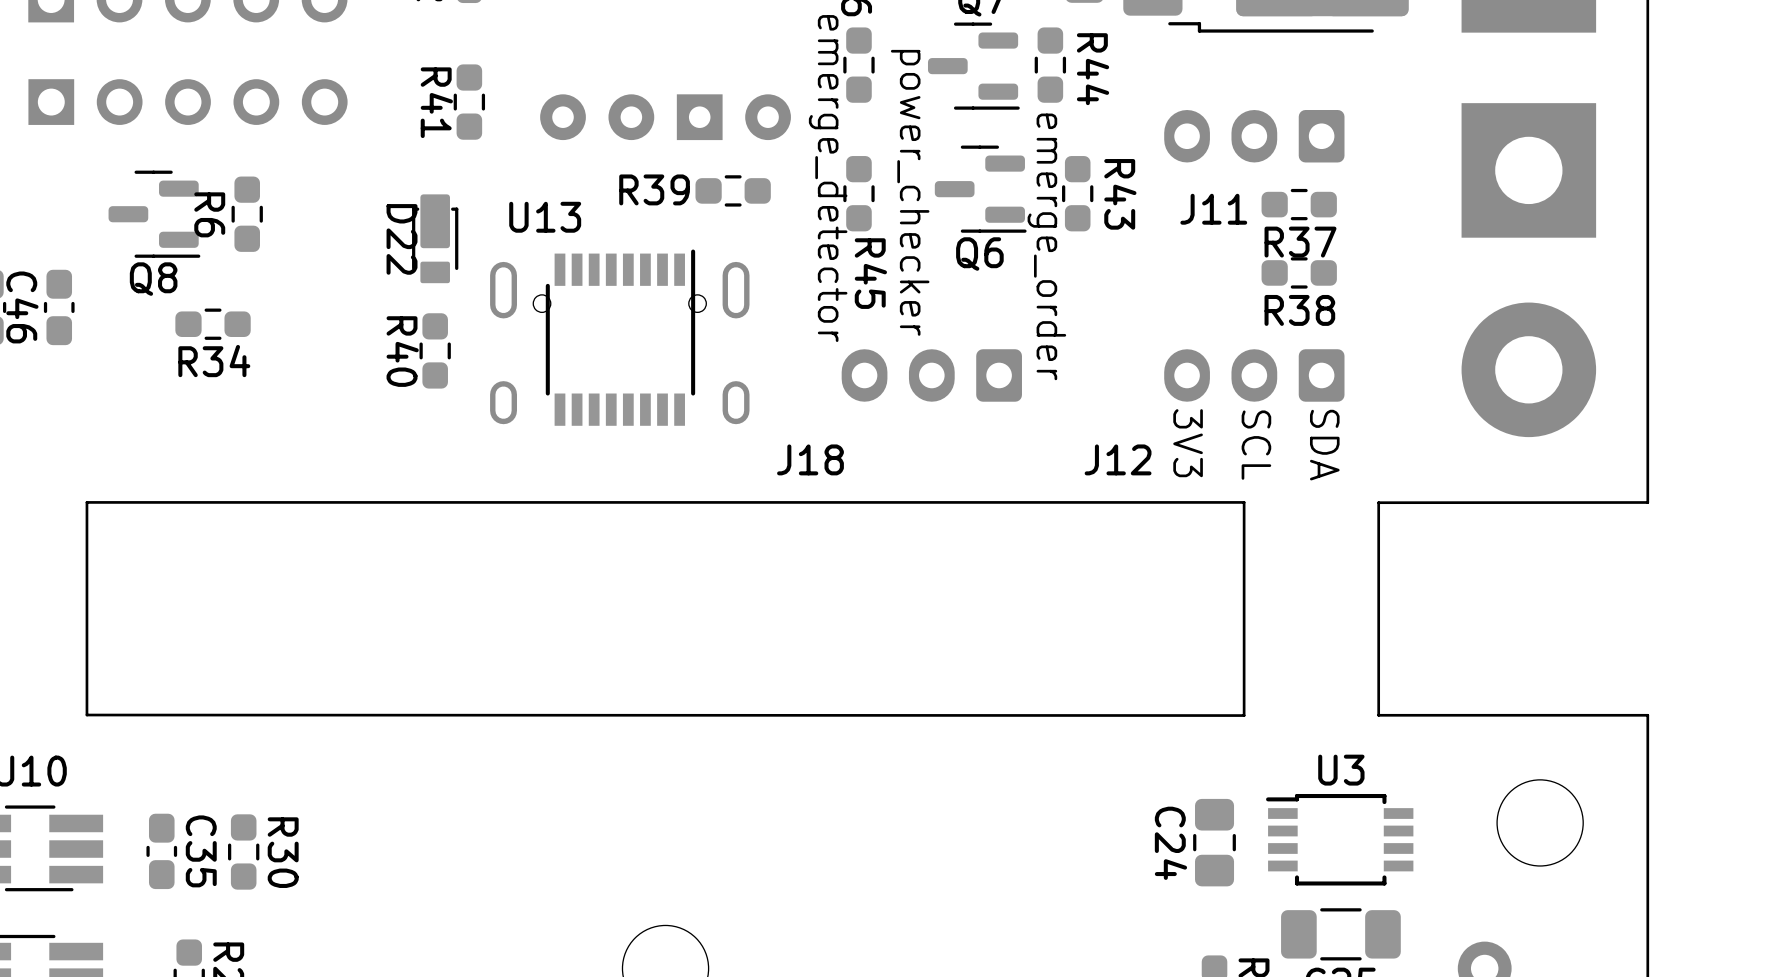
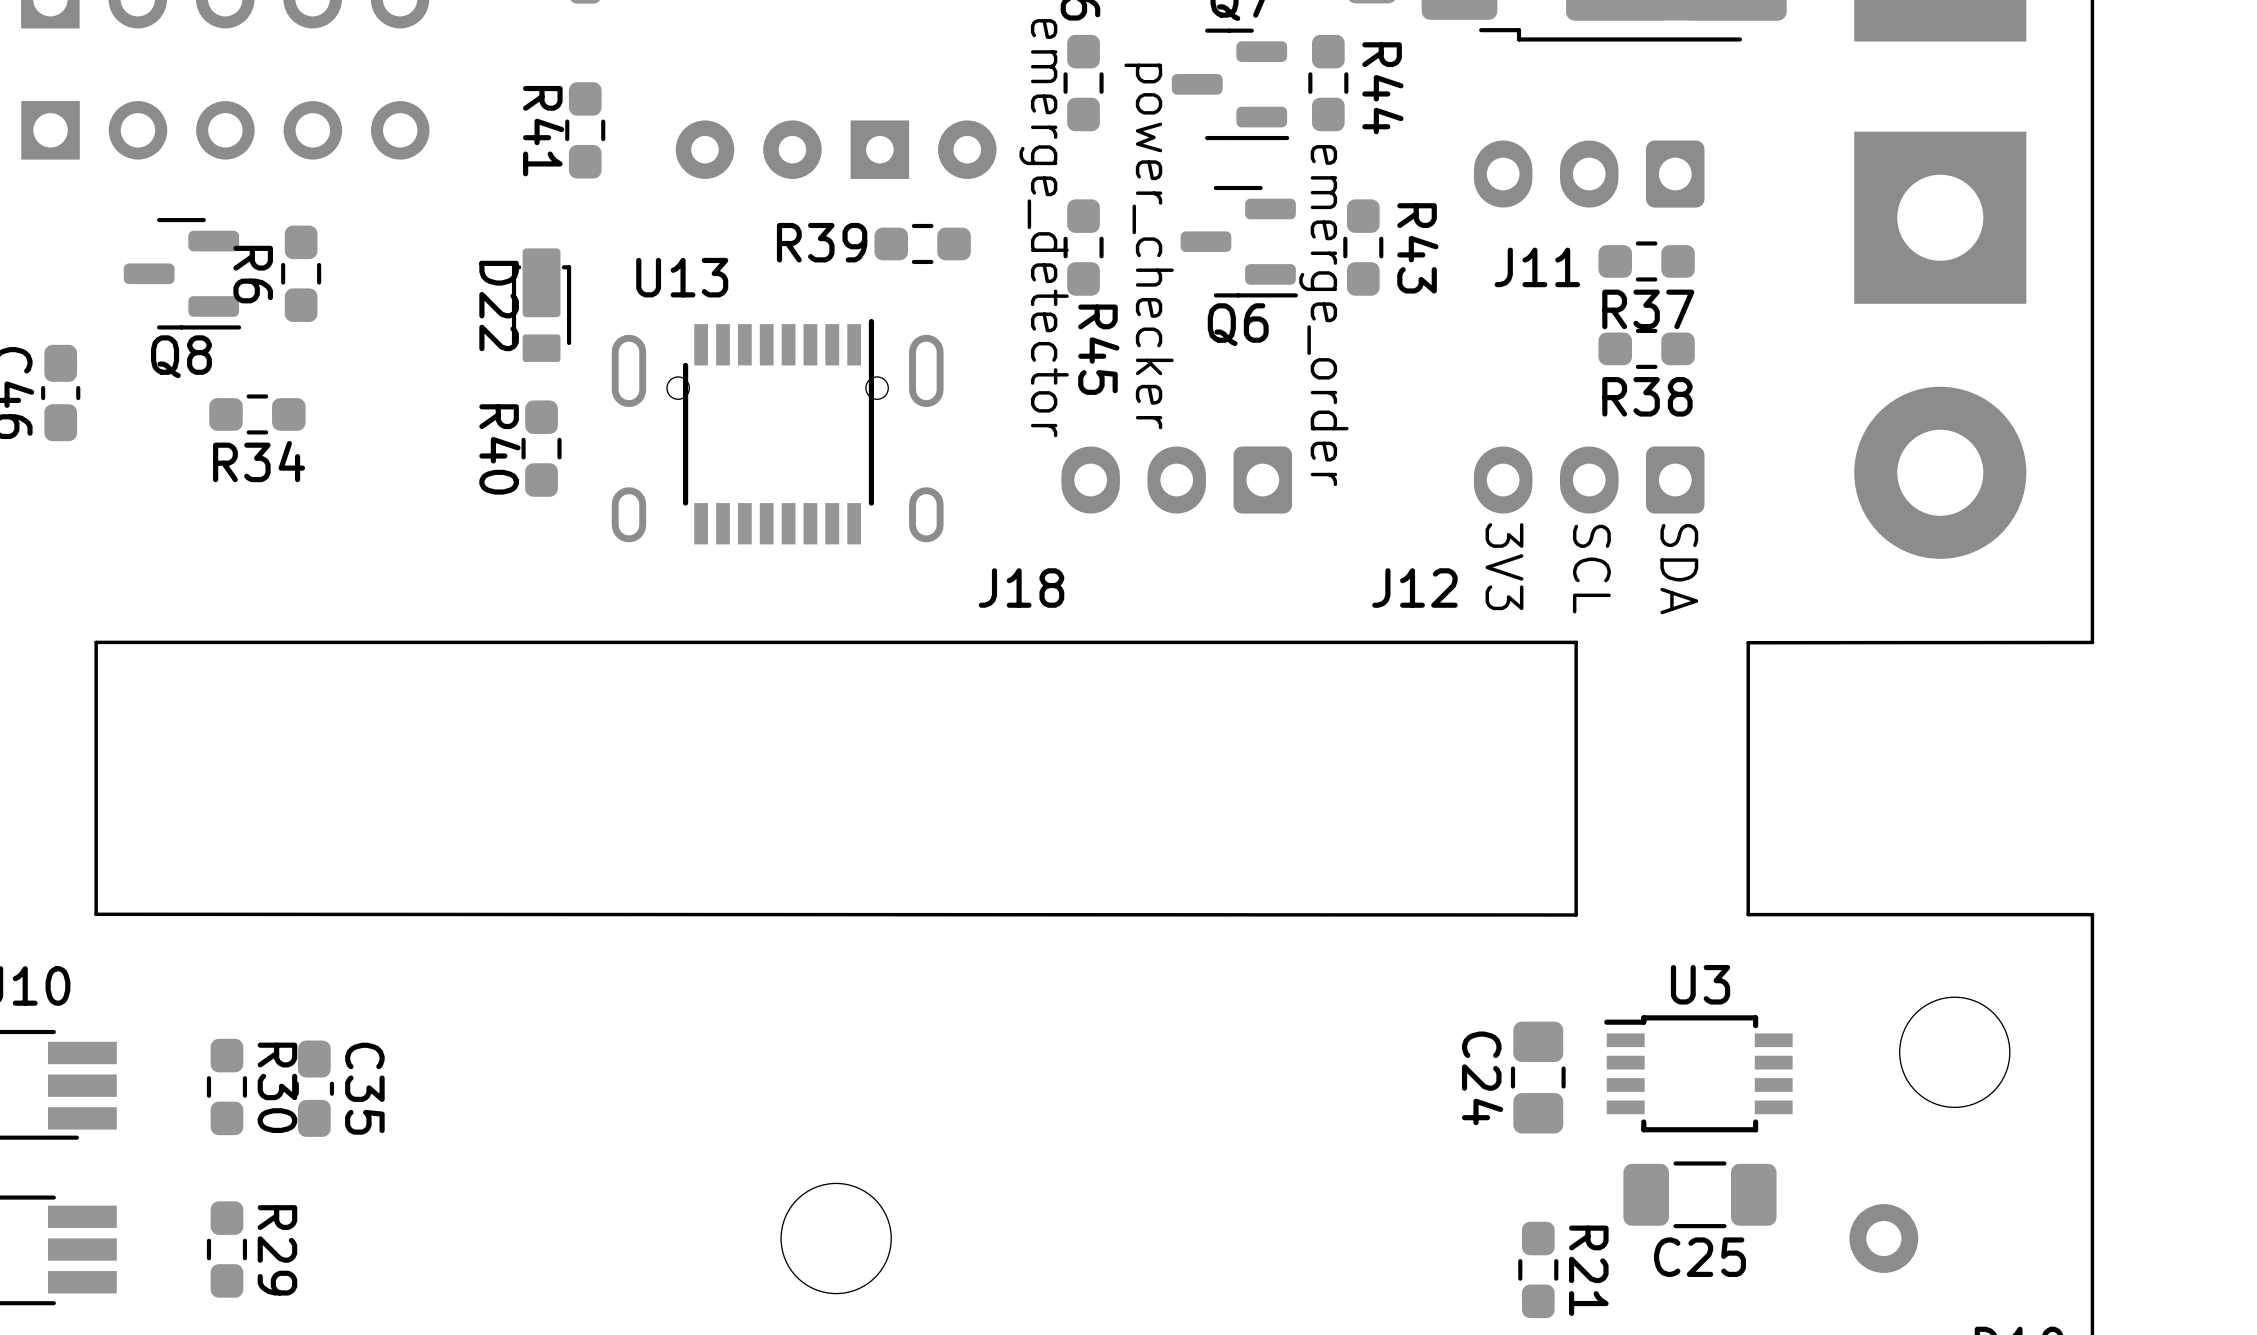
C35 position: (161, 851) -> (314, 1088)
R30 position: (243, 851) -> (226, 1086)

